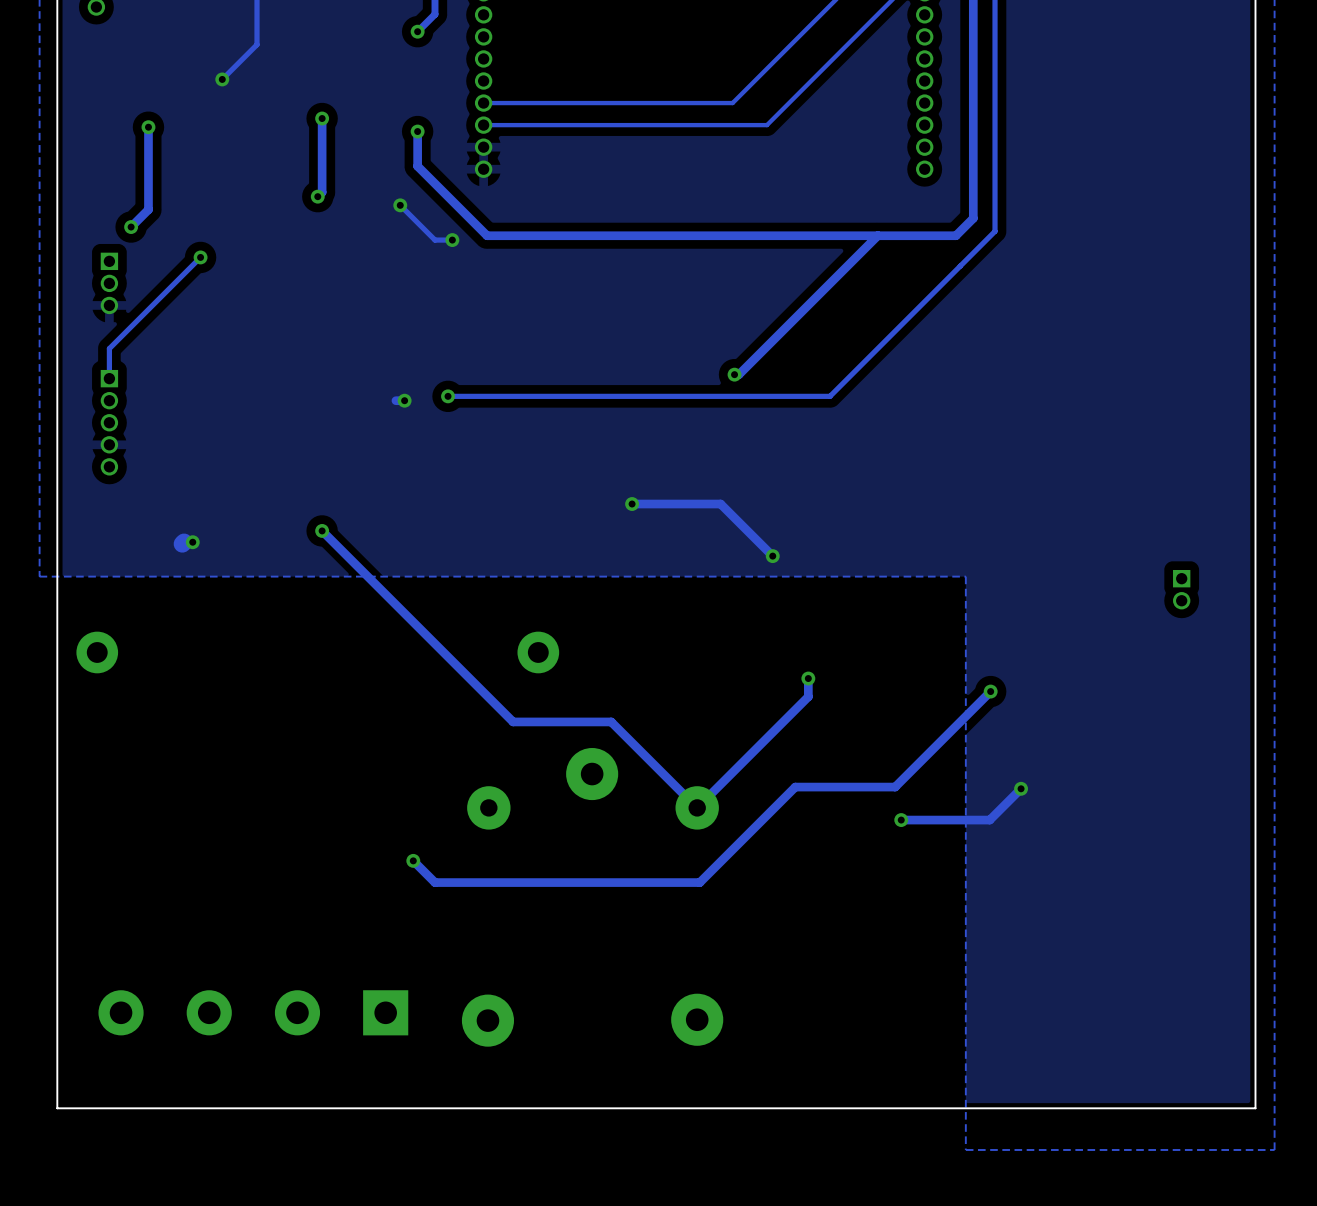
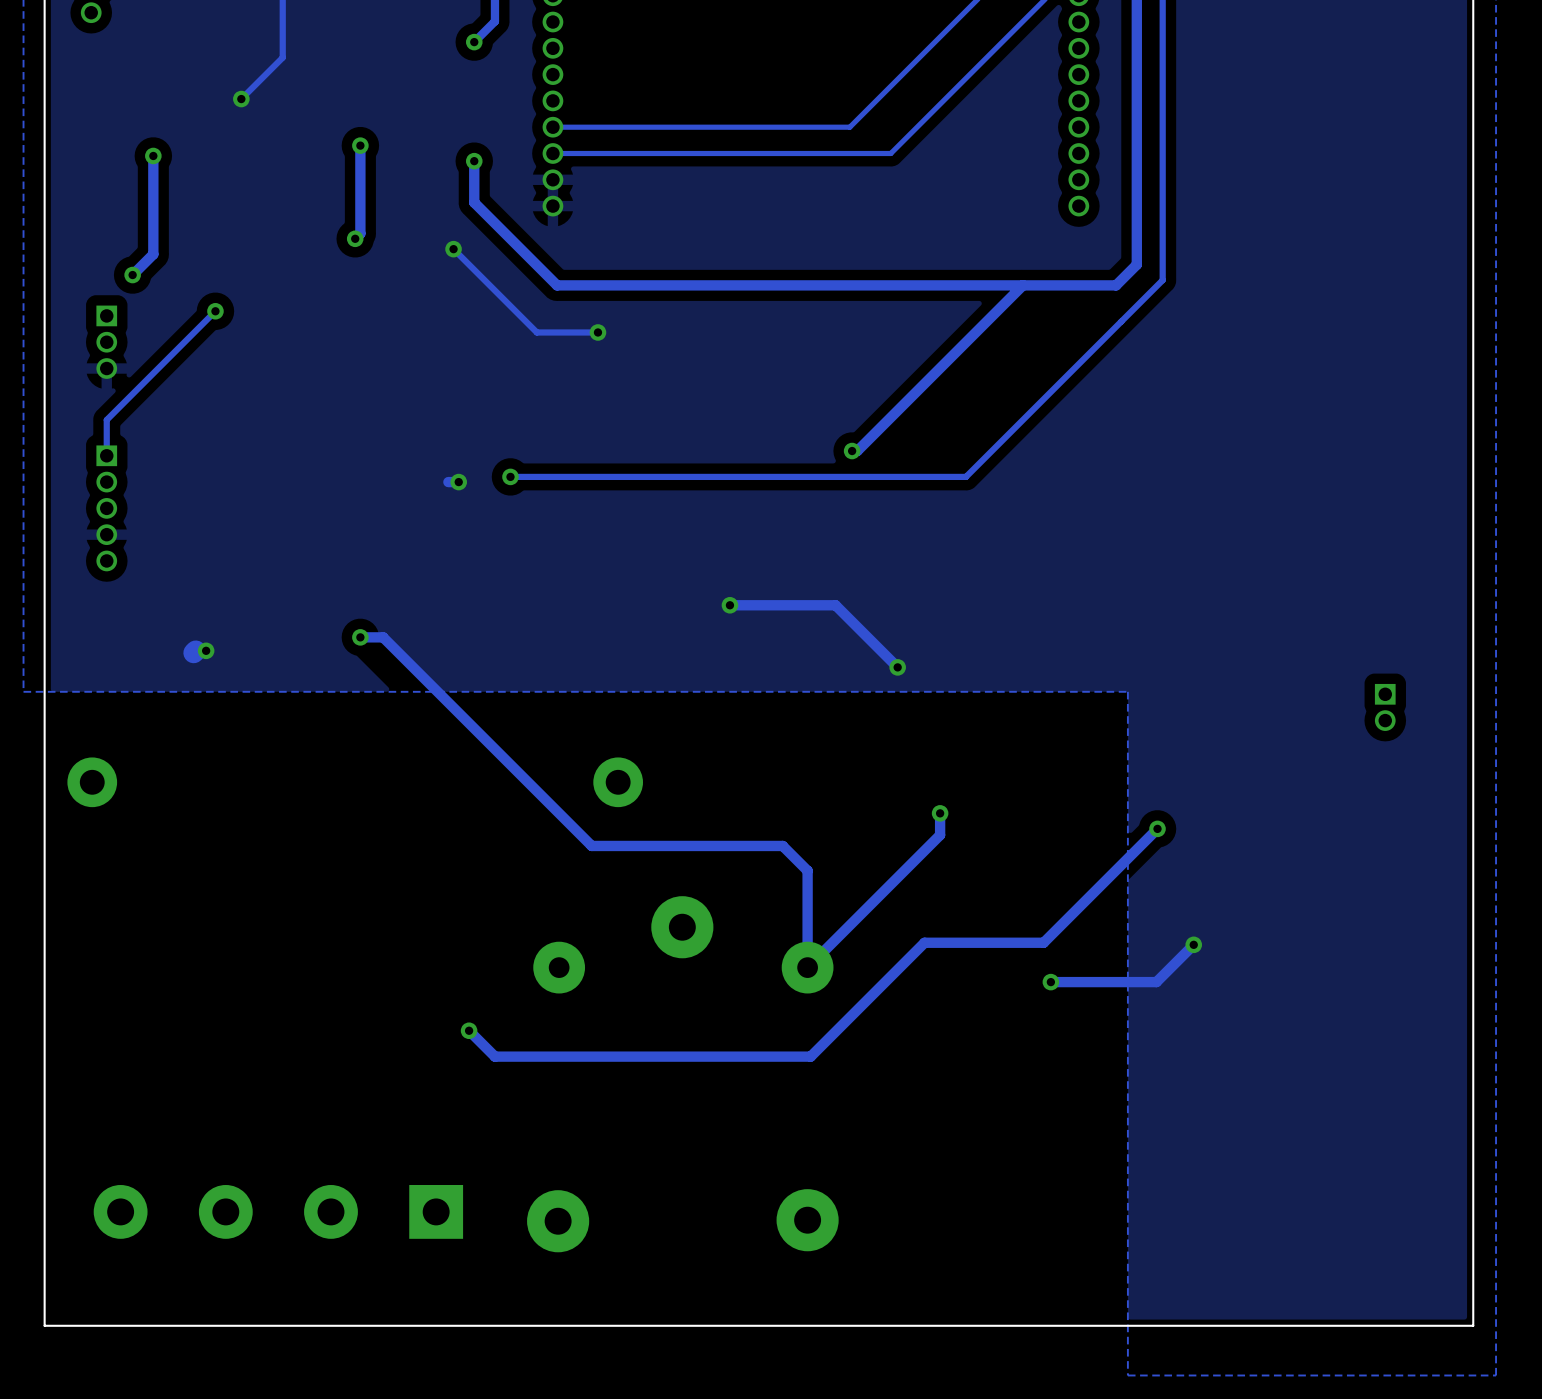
track: (452, 240) (435, 240) -> (597, 332) (536, 332) (494, 290)
via position: (452, 240) -> (597, 332)
track: (322, 530) (513, 721) (611, 721) (697, 807) -> (360, 637) (383, 637) (591, 845) (782, 845) (807, 870) (807, 967)

